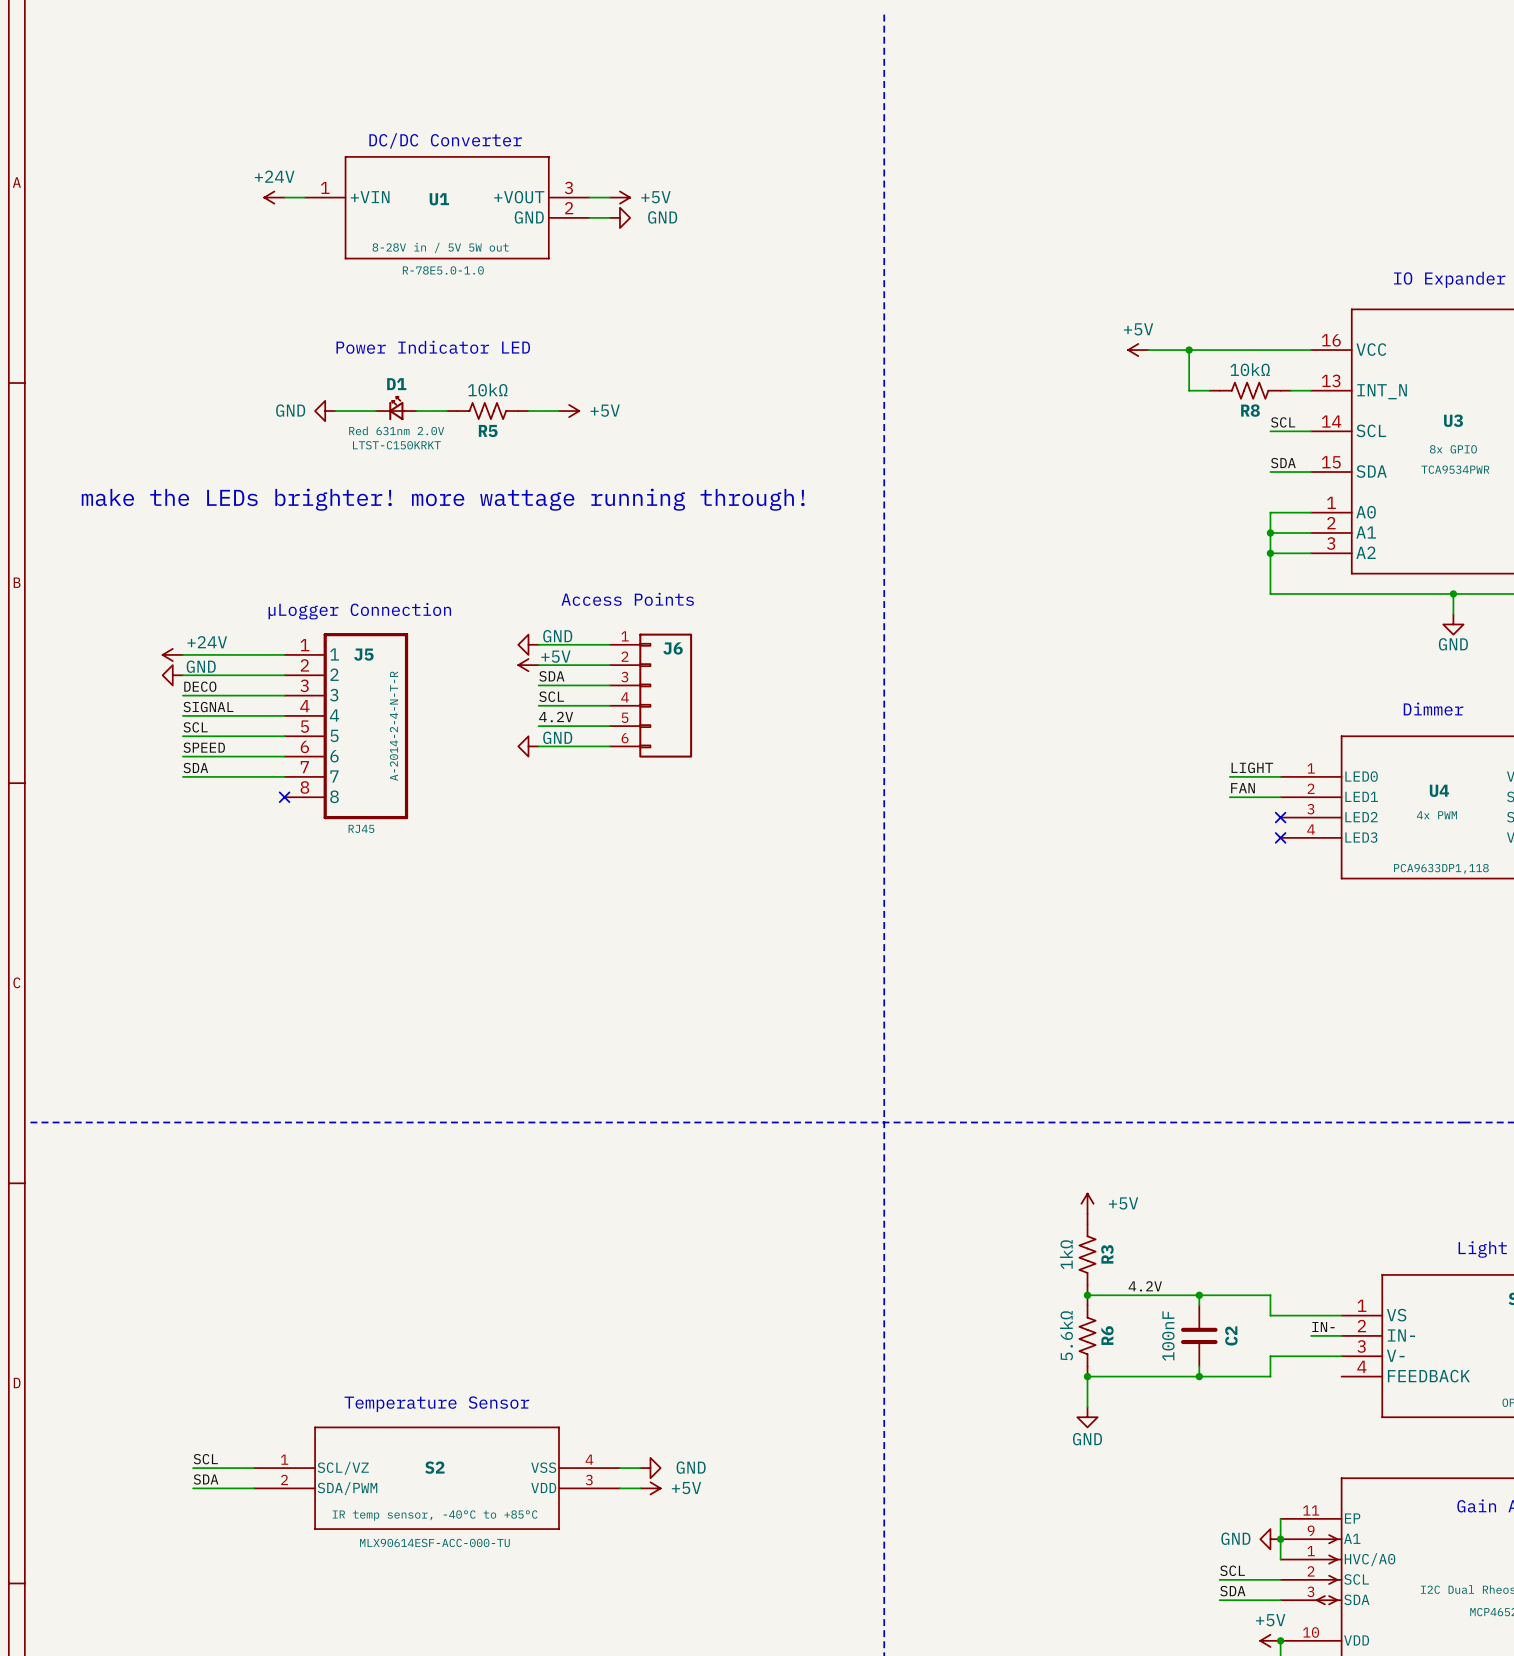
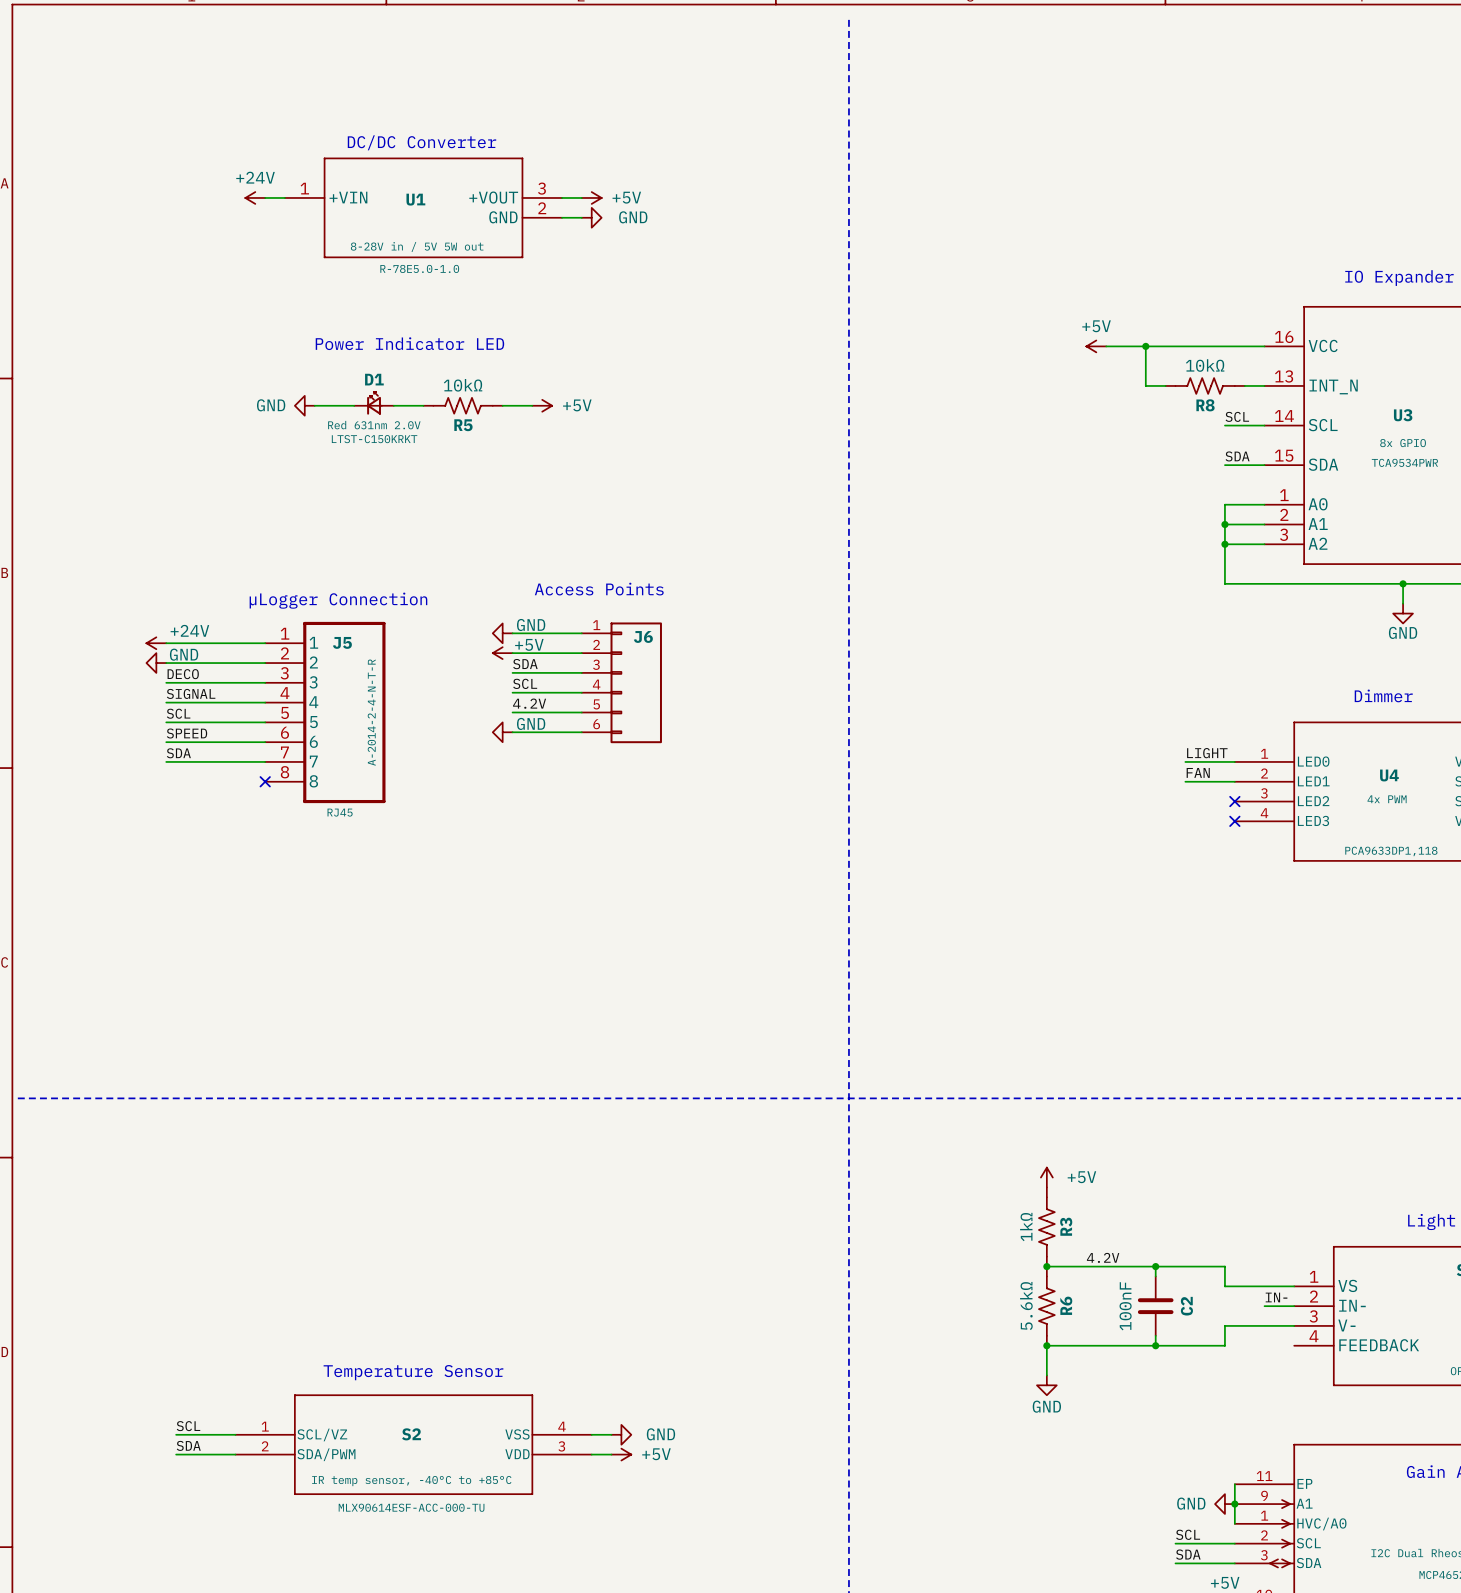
text: make the LEDs brighter! more wattage running through! (443, 499) -> none

